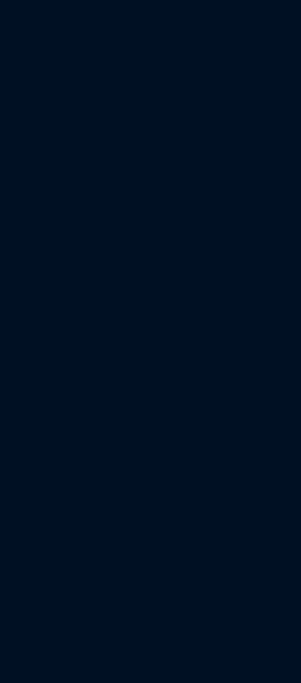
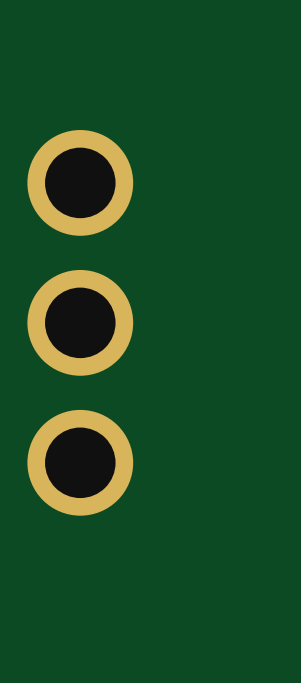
part: none -> (80, 322)

